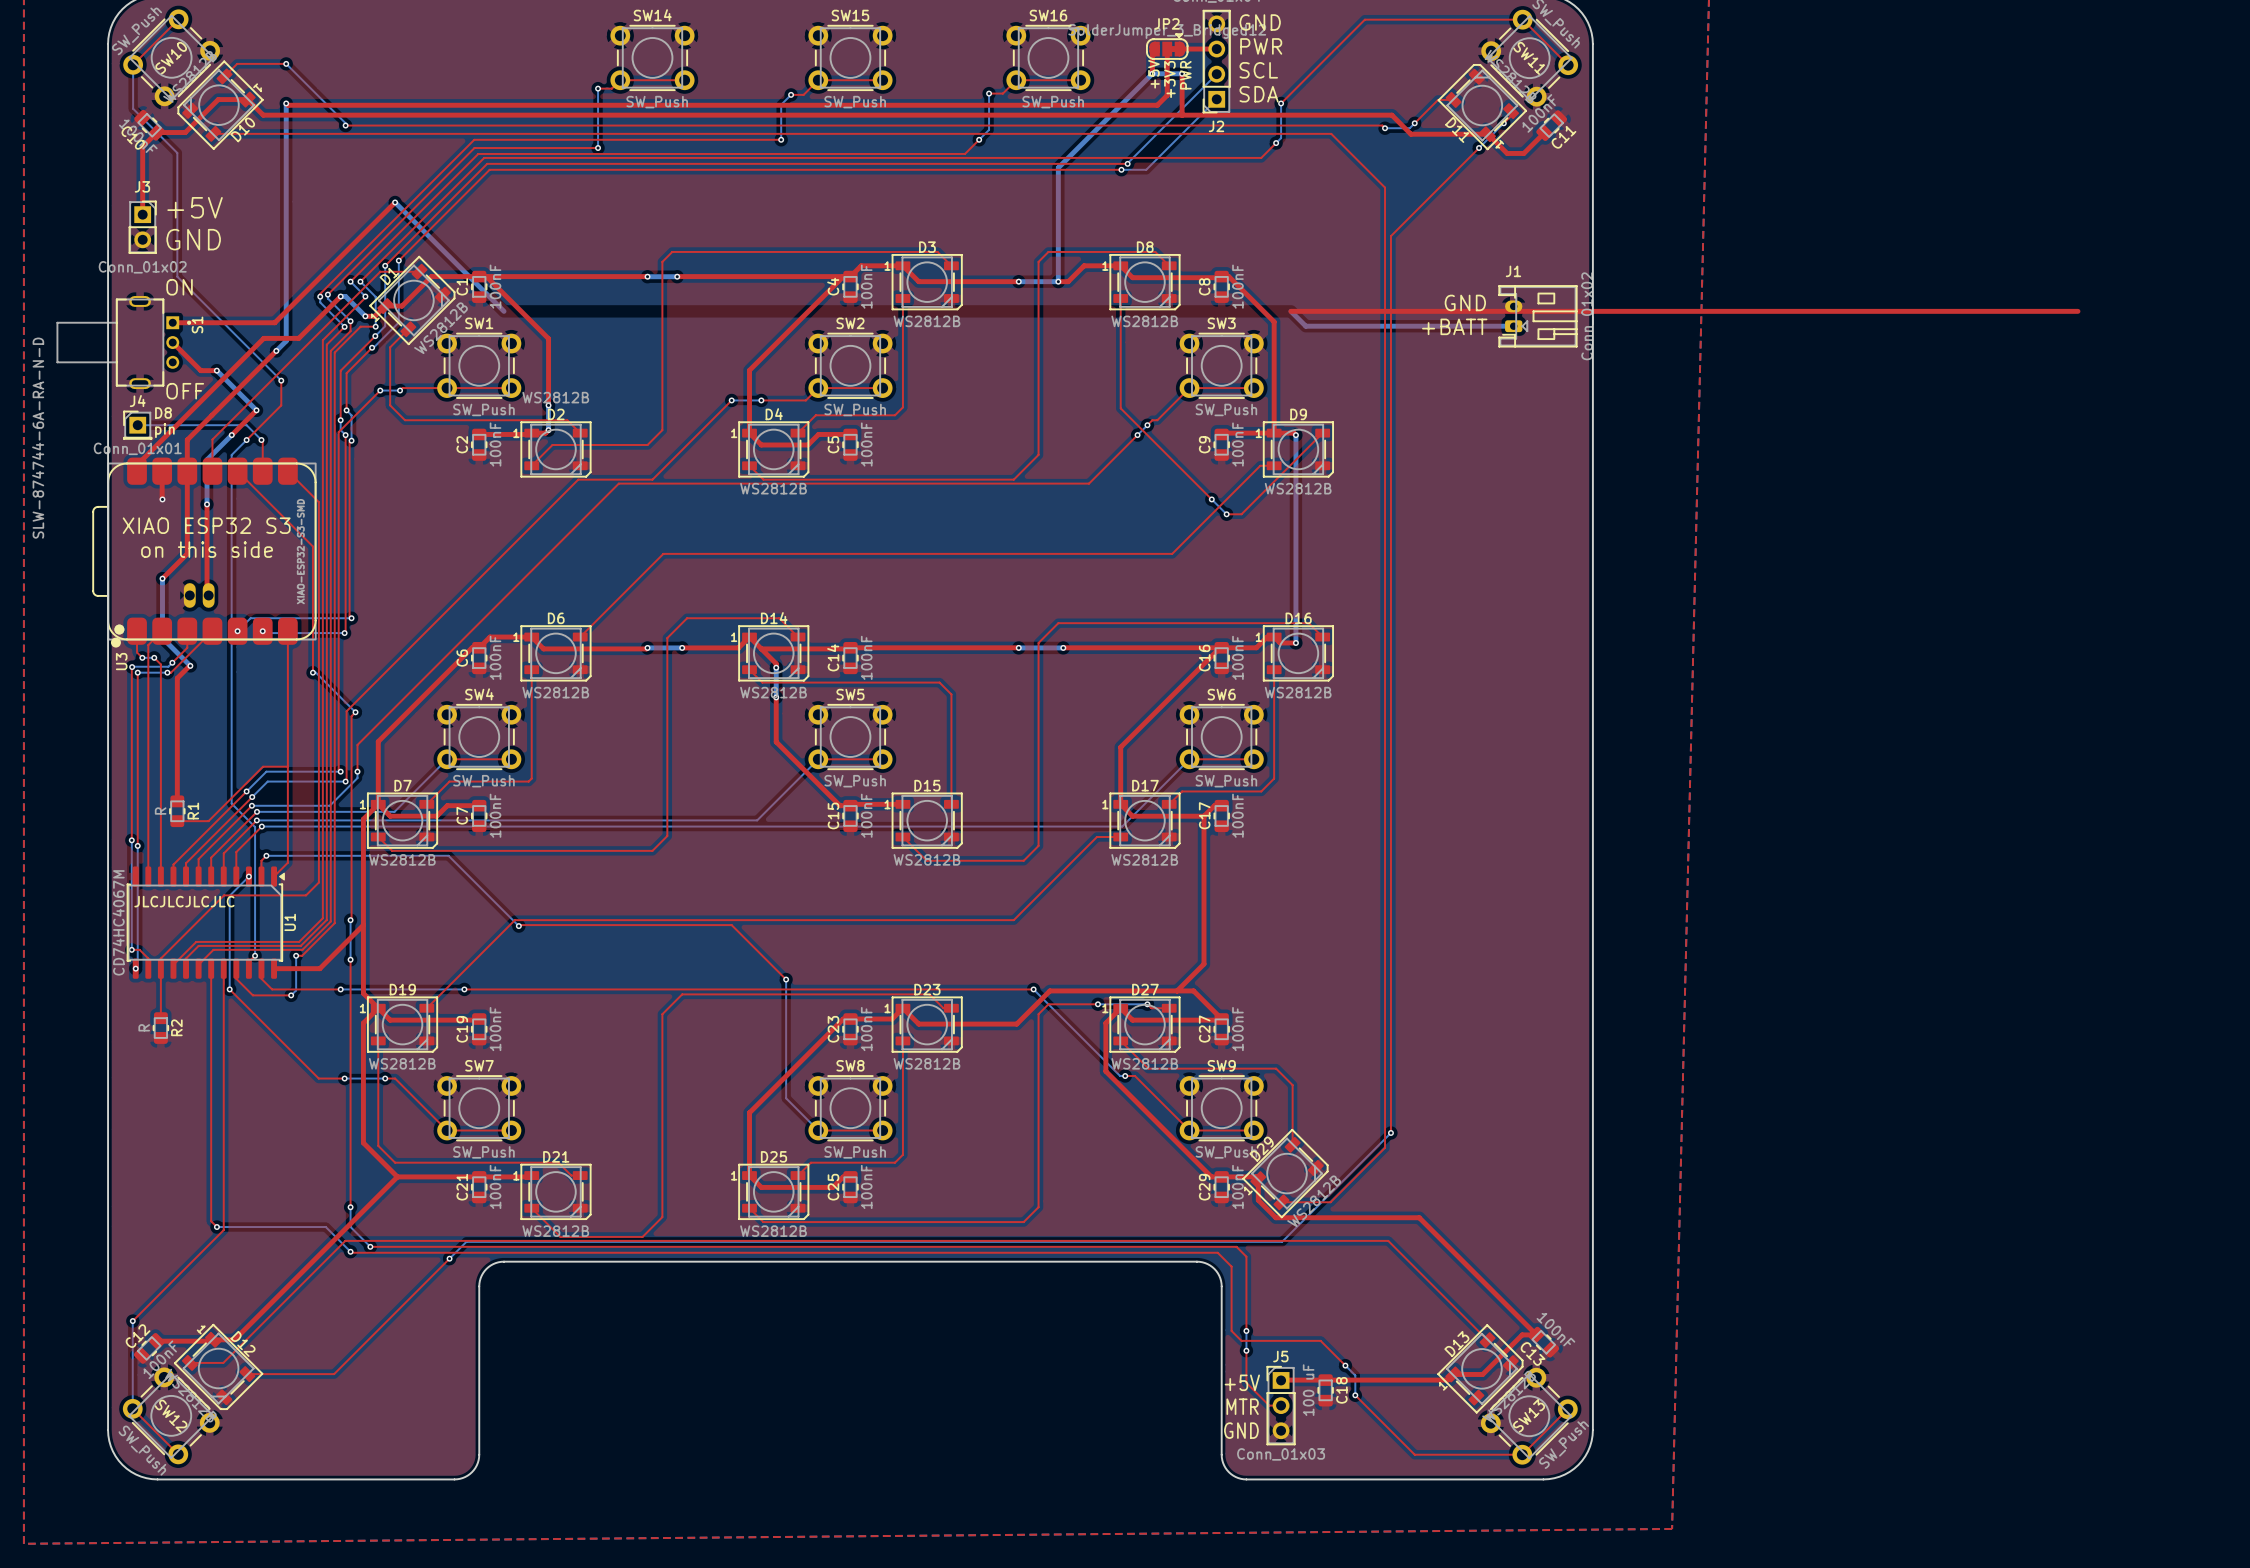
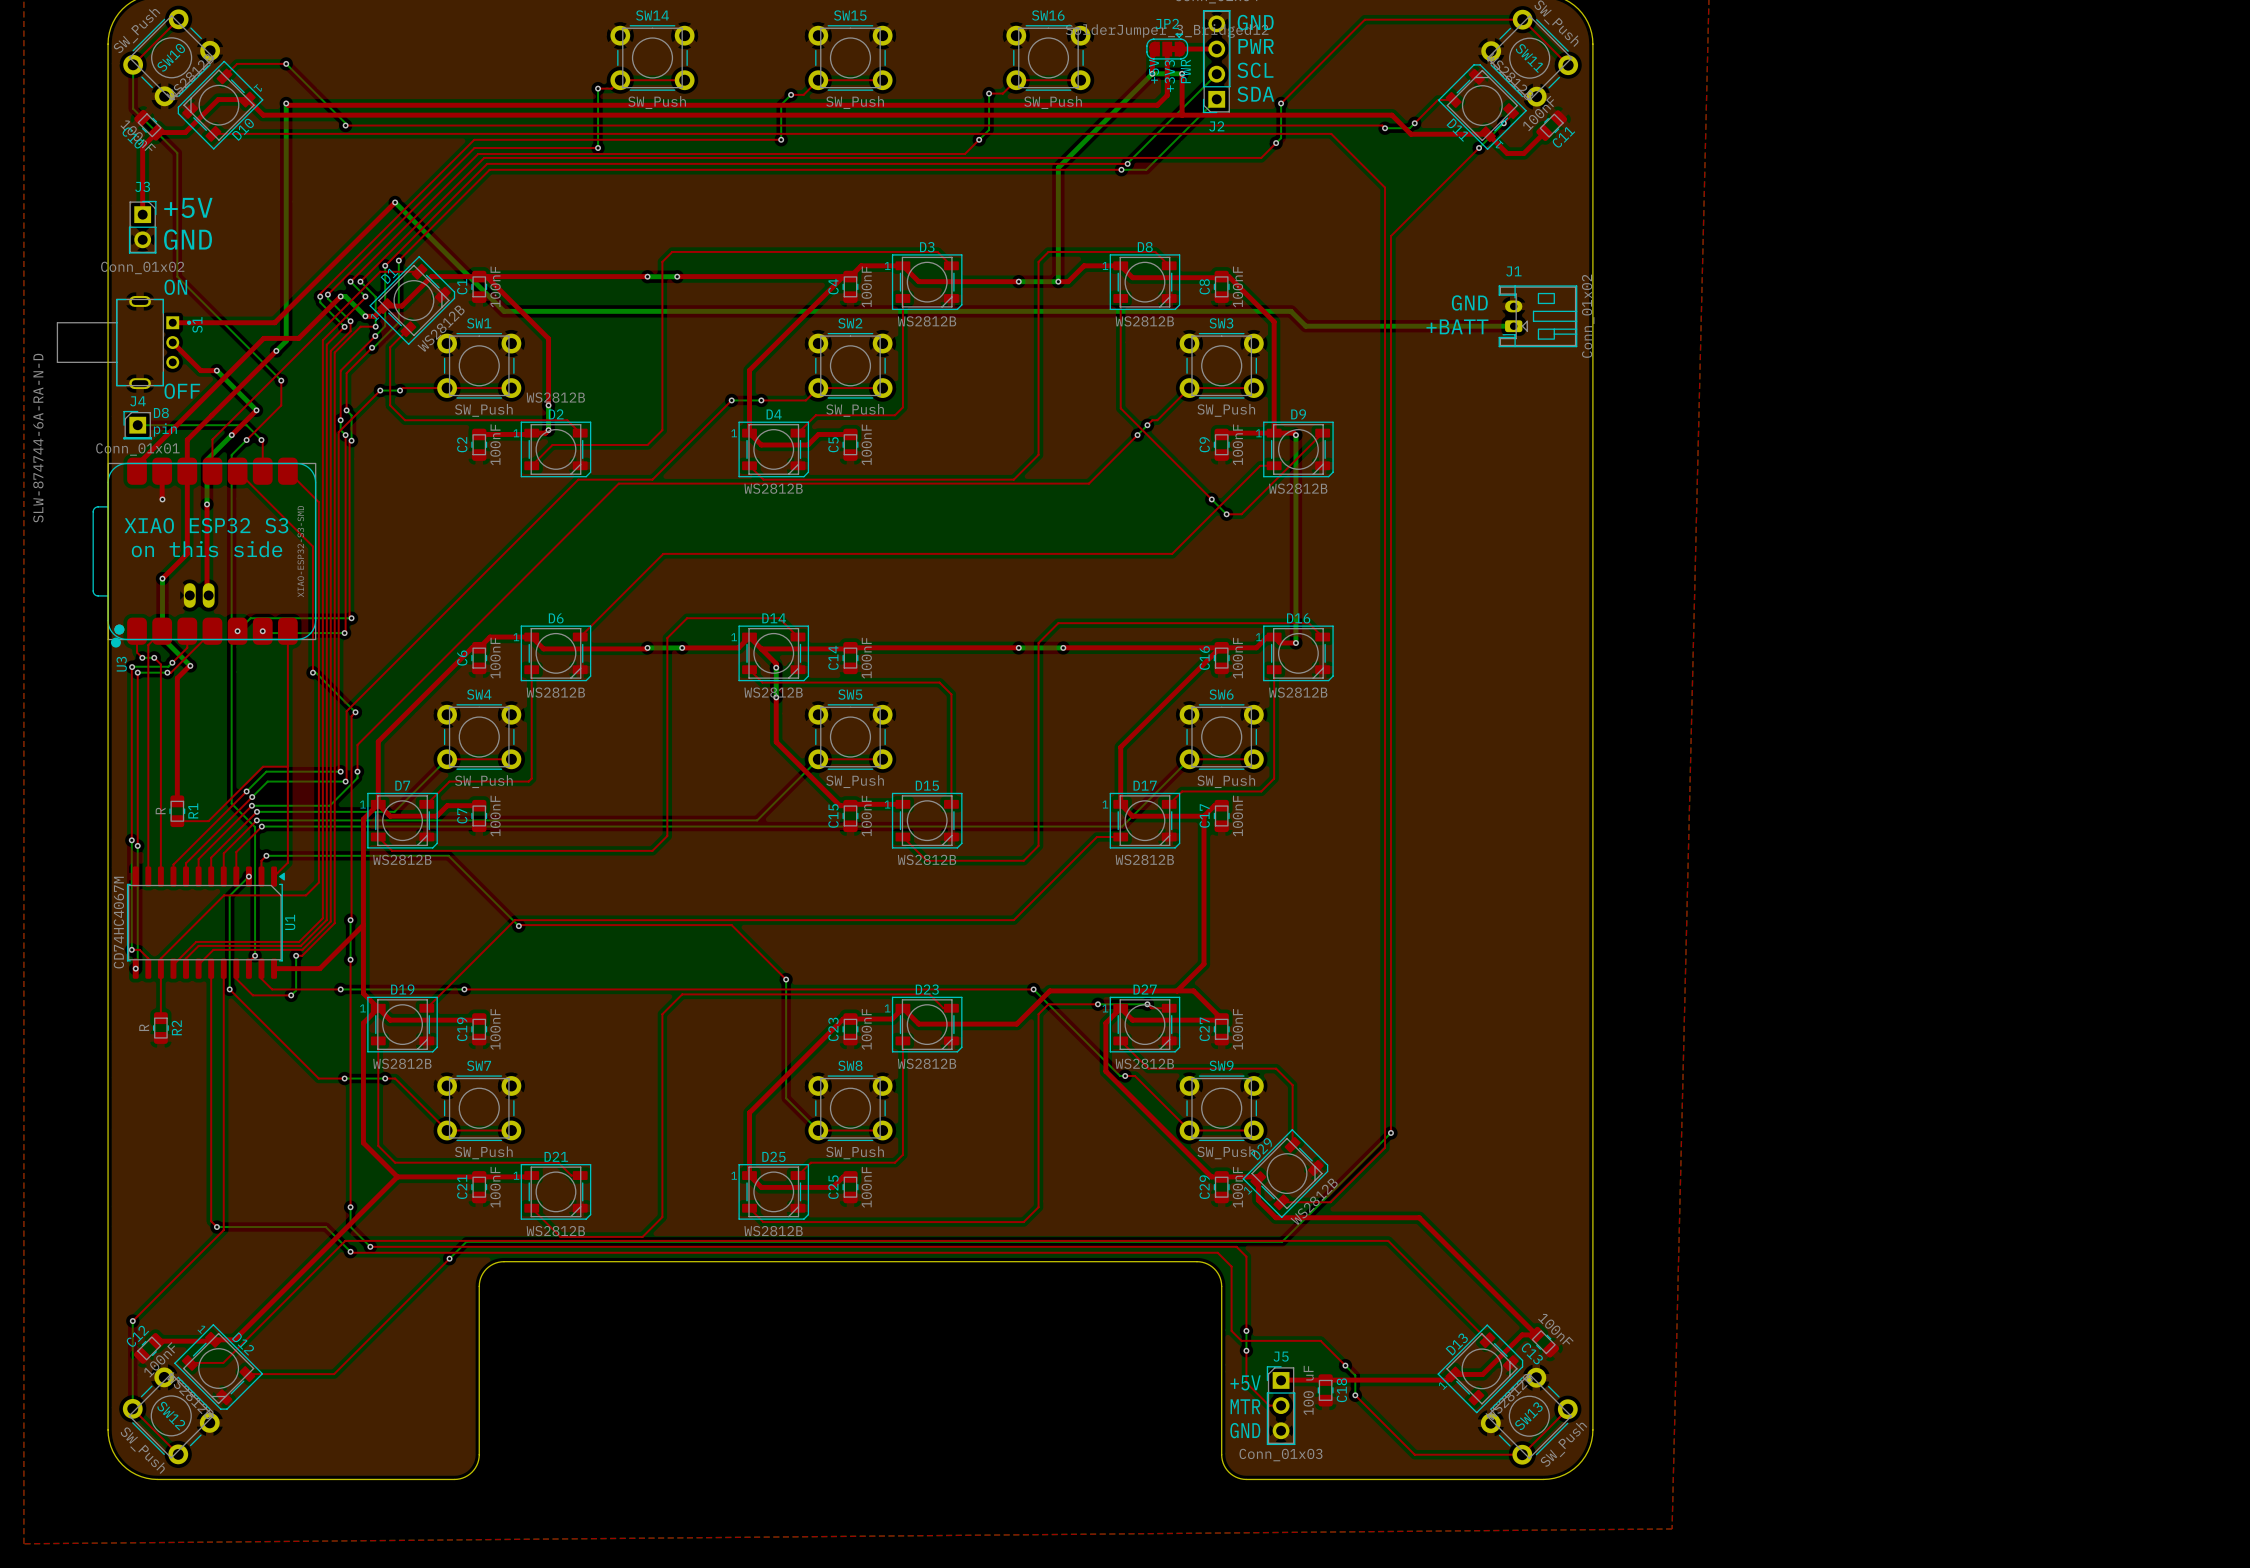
bottom track: none -> (504, 311) (1290, 311)
top track: (1290, 311) (2077, 311) -> none
text: JLCJLCJLCJLC (184, 901) -> none

